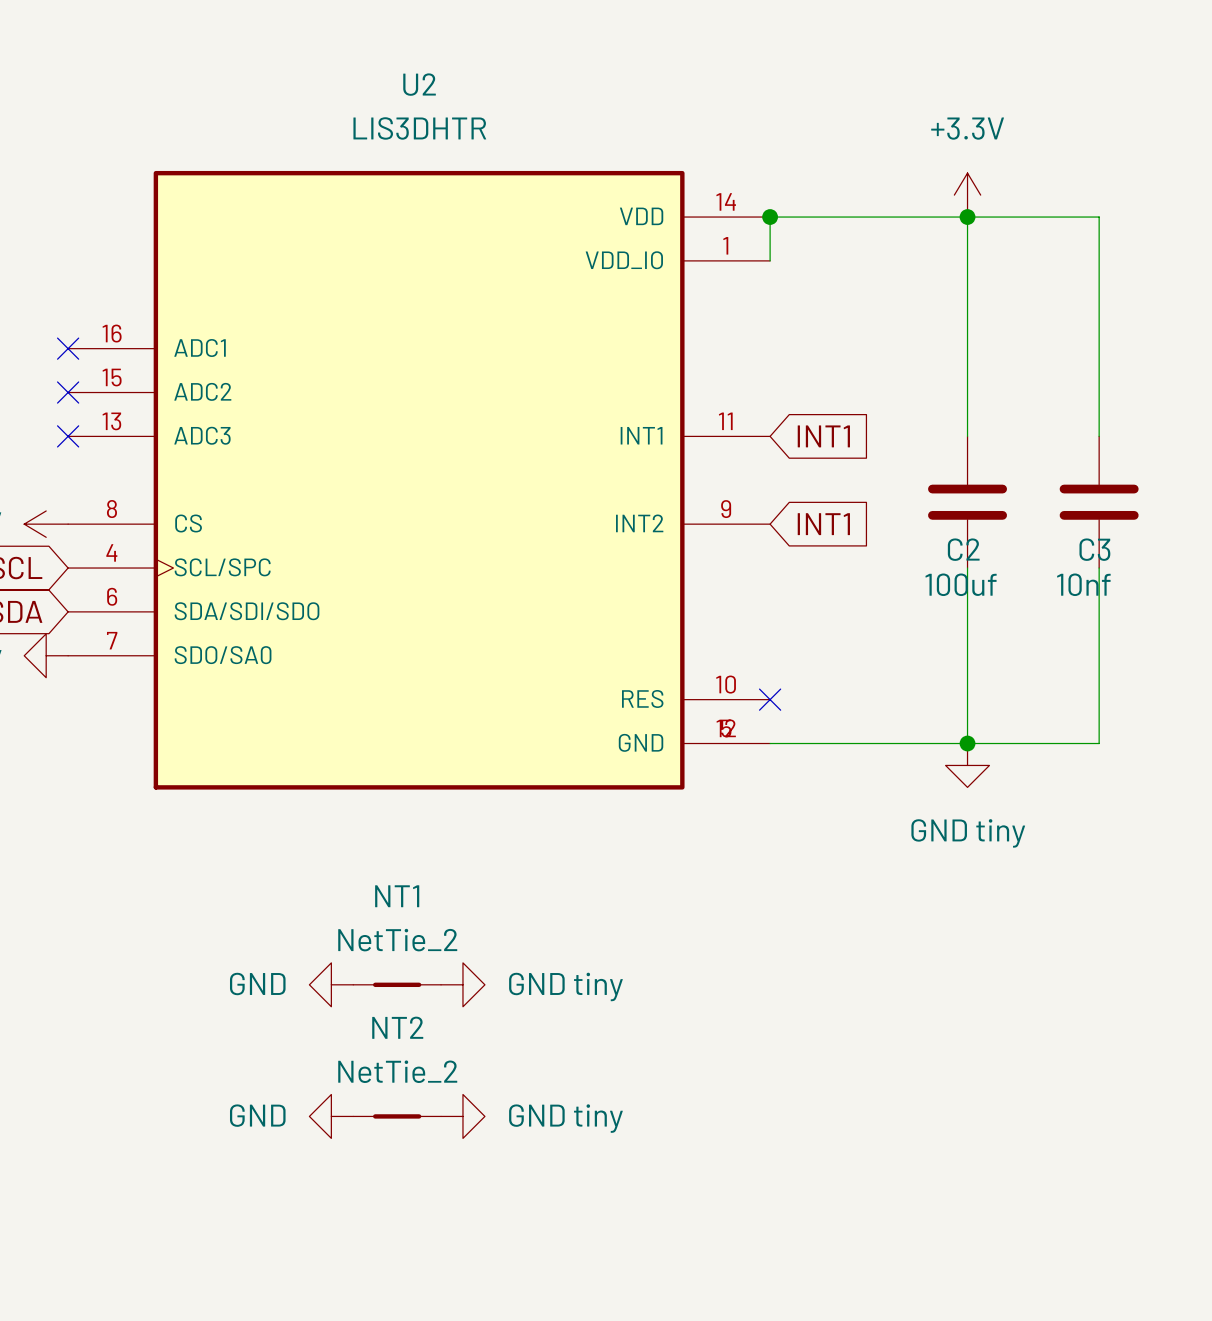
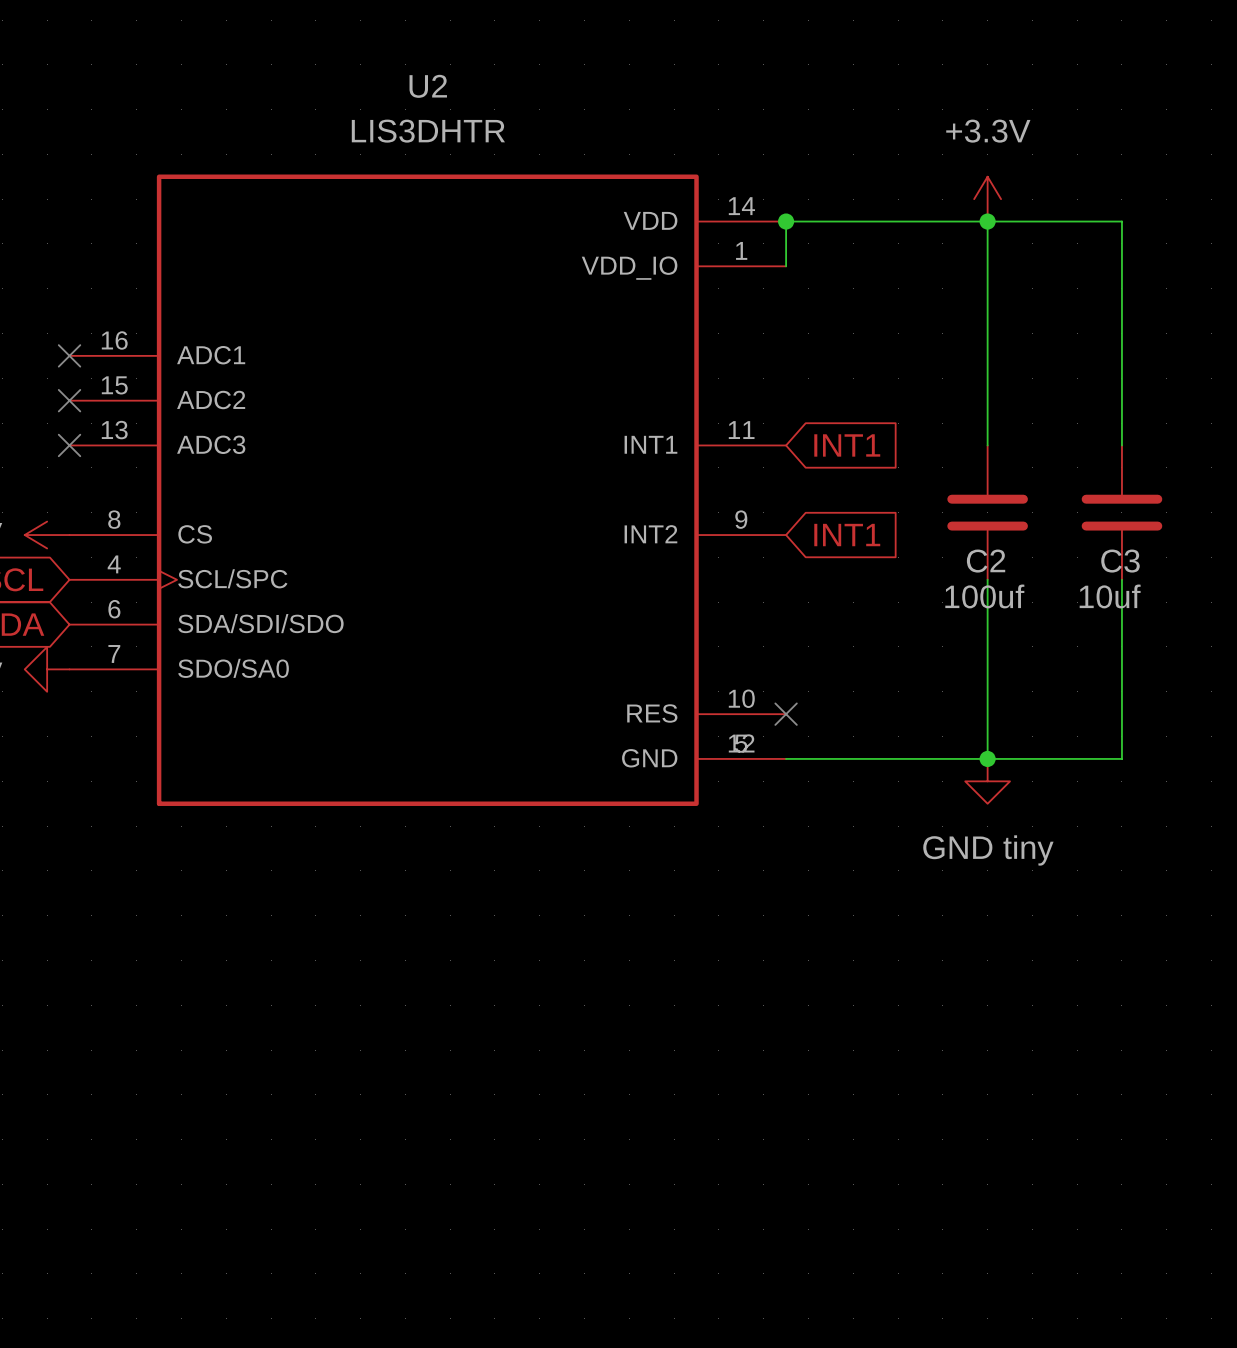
C3 value: 10nf (1083, 584) -> 10uf (1110, 596)
power symbol: GND (331, 984) -> none
NT1: NetTie_2 (397, 984) -> none
power symbol: GND tiny (462, 984) -> none
power symbol: GND (331, 1116) -> none
NT2: NetTie_2 (397, 1116) -> none
power symbol: GND tiny (462, 1116) -> none

